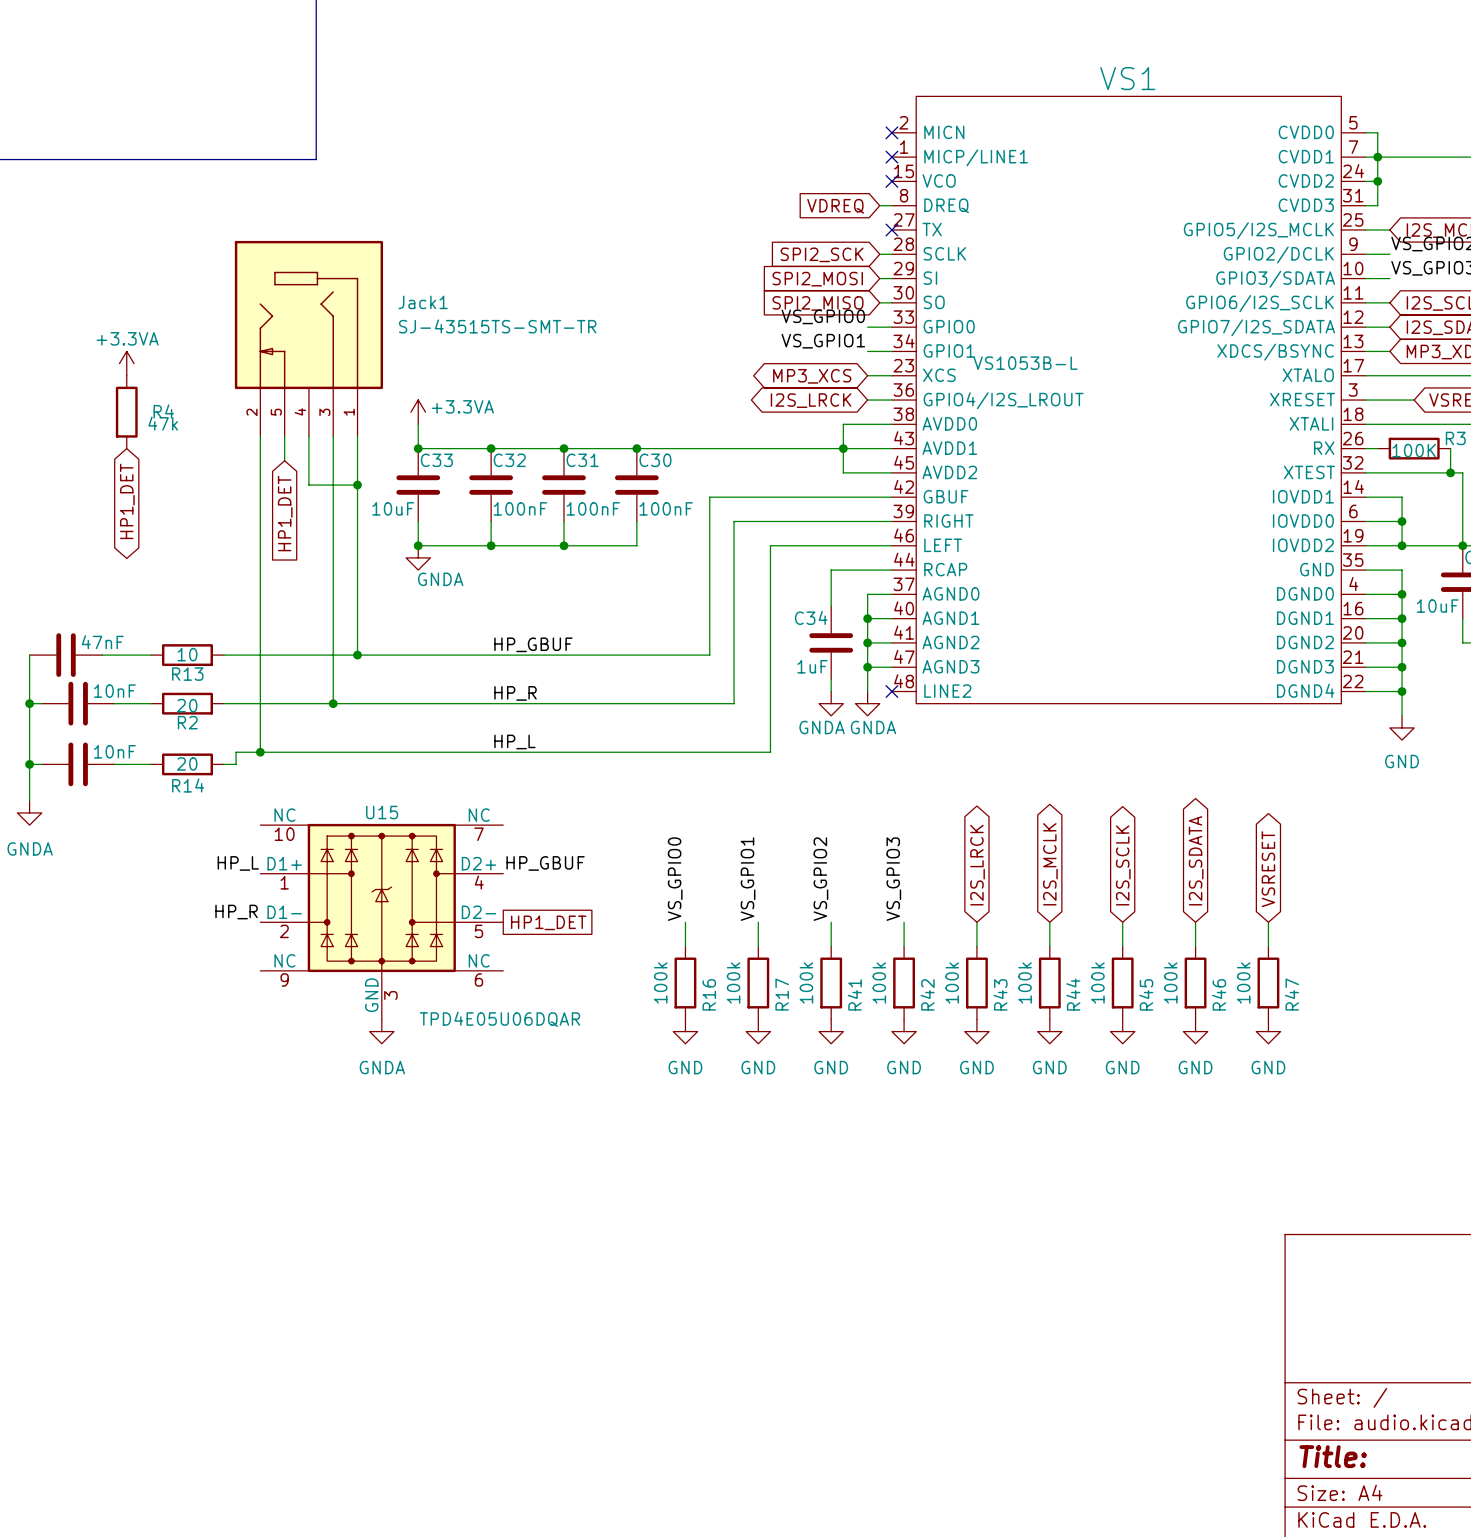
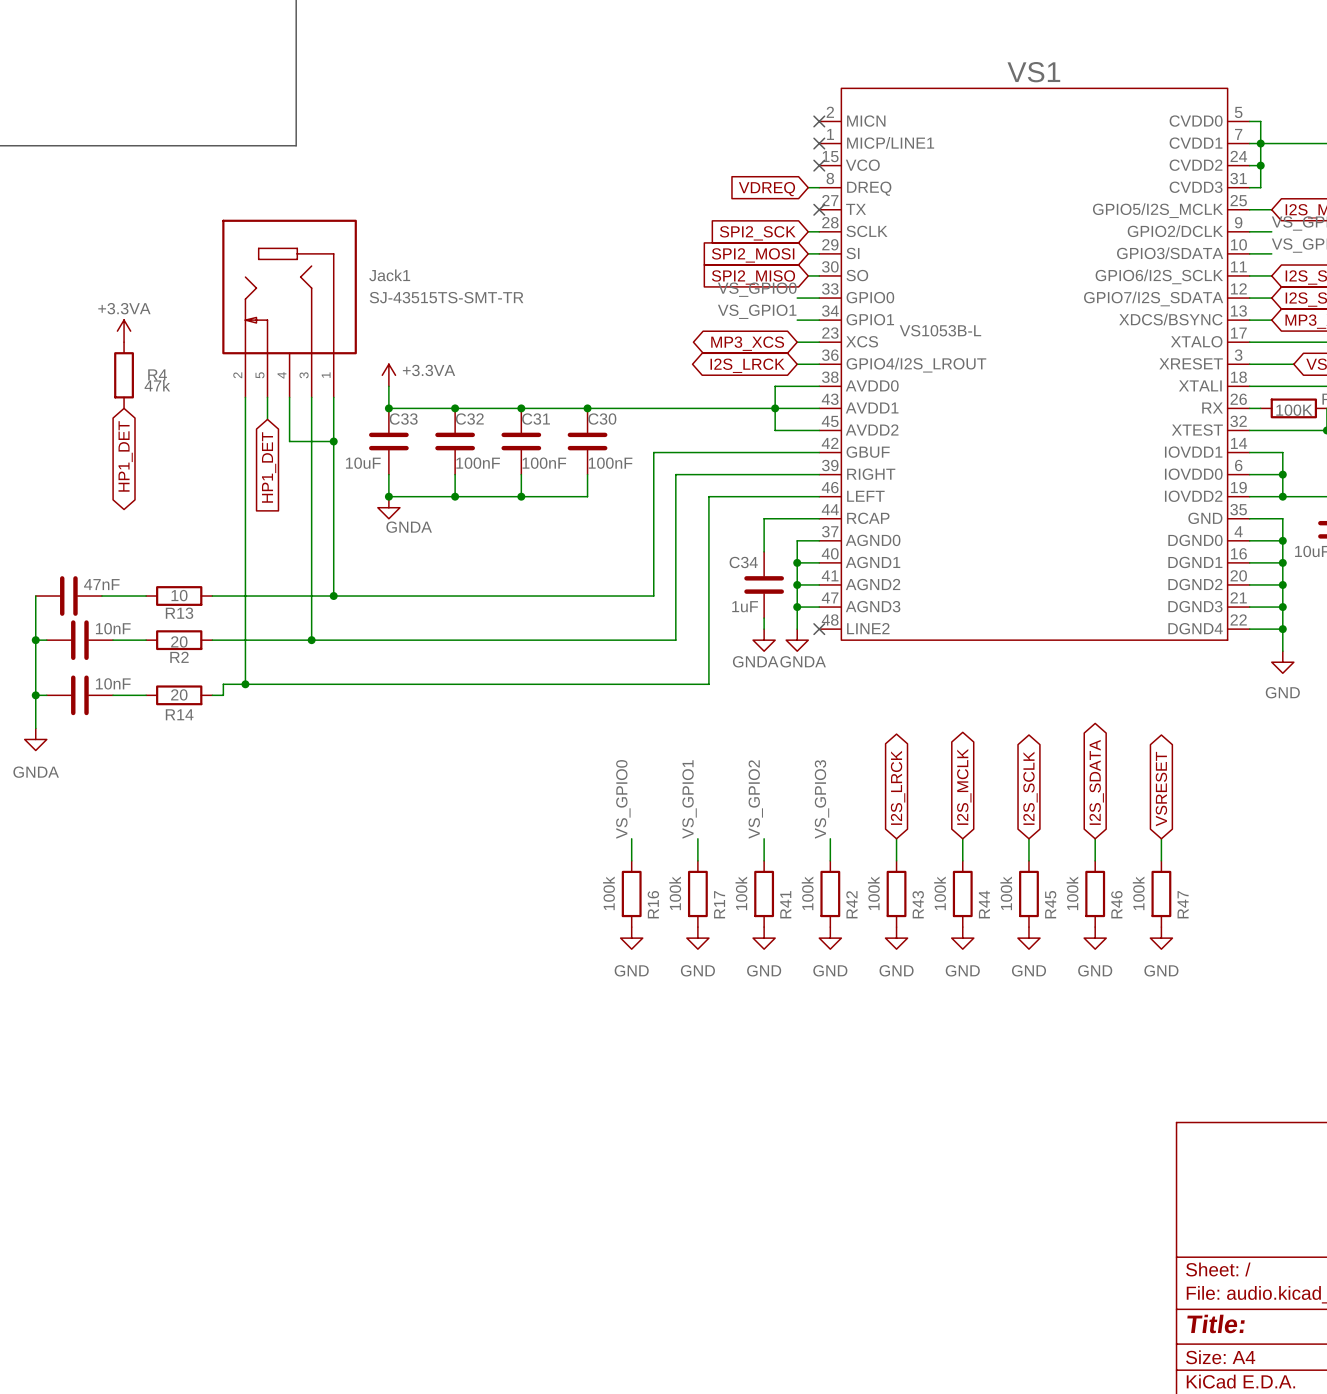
label: HP_GBUF (533, 644) -> none
label: HP_R (515, 693) -> none
label: HP_L (514, 741) -> none
label: HP_L (238, 863) -> none
label: HP_GBUF (545, 863) -> none
label: HP_R (236, 912) -> none
U15: TPD4E05U06DQAR (381, 921) -> none
global label: HP1_DET (548, 922) -> none
power symbol: GNDA (381, 1031) -> none

